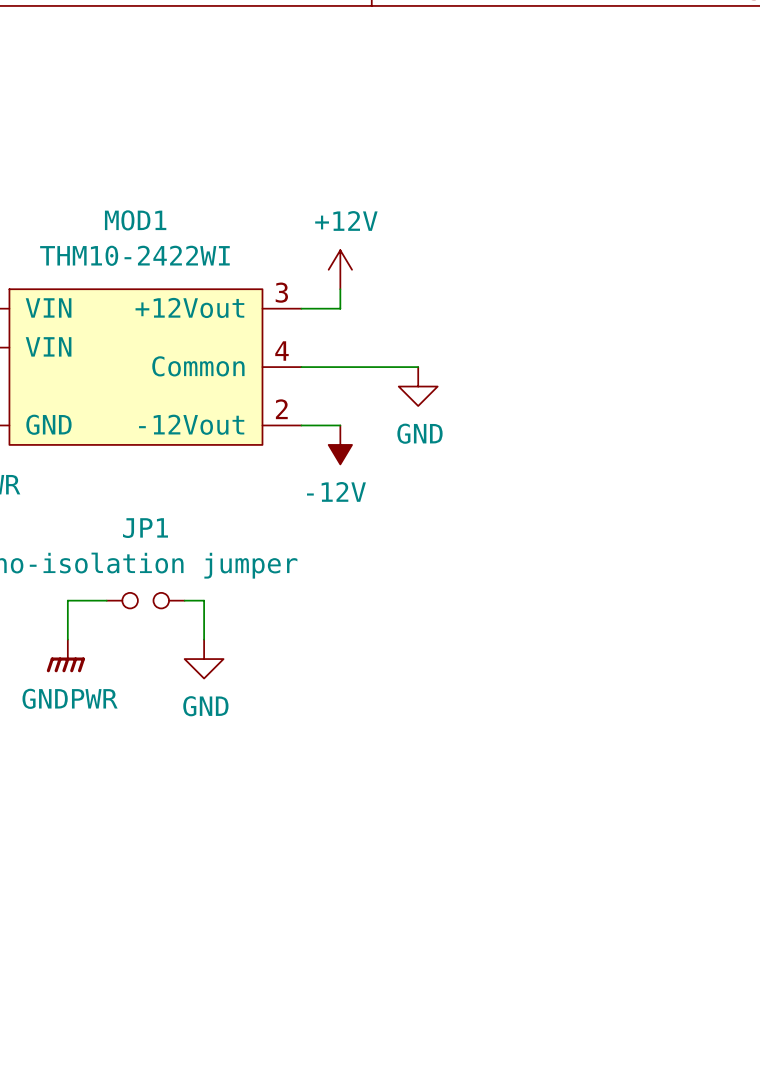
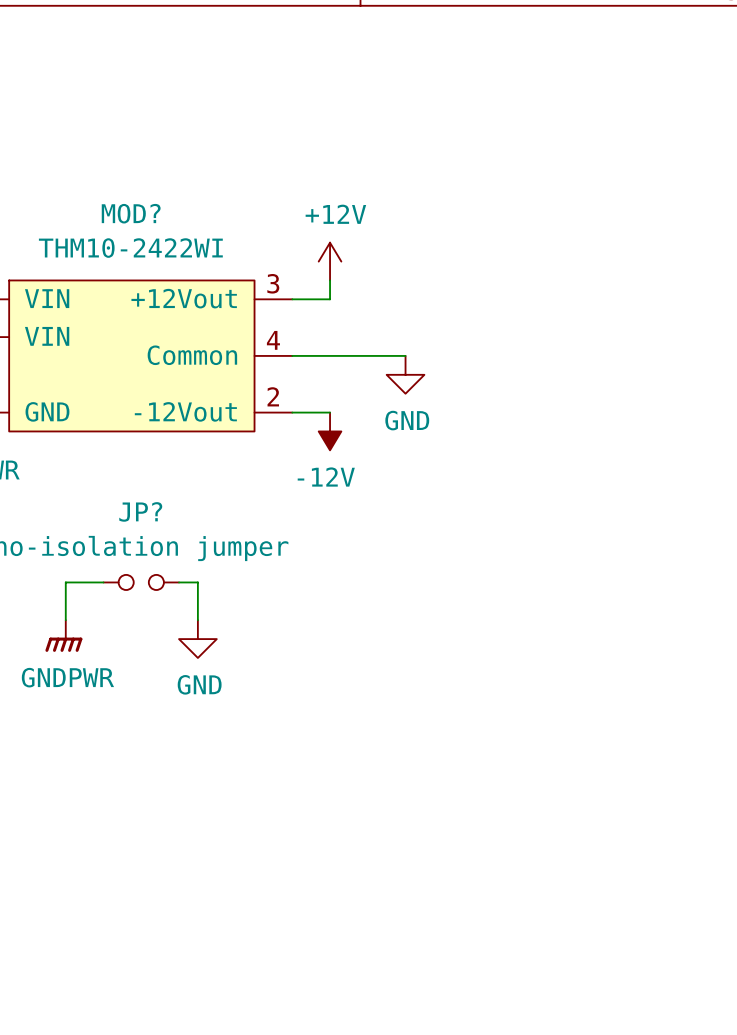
MOD1 name: MOD1 (135, 220) -> MOD? (131, 213)
JP1 name: JP1 (145, 528) -> JP? (140, 511)

